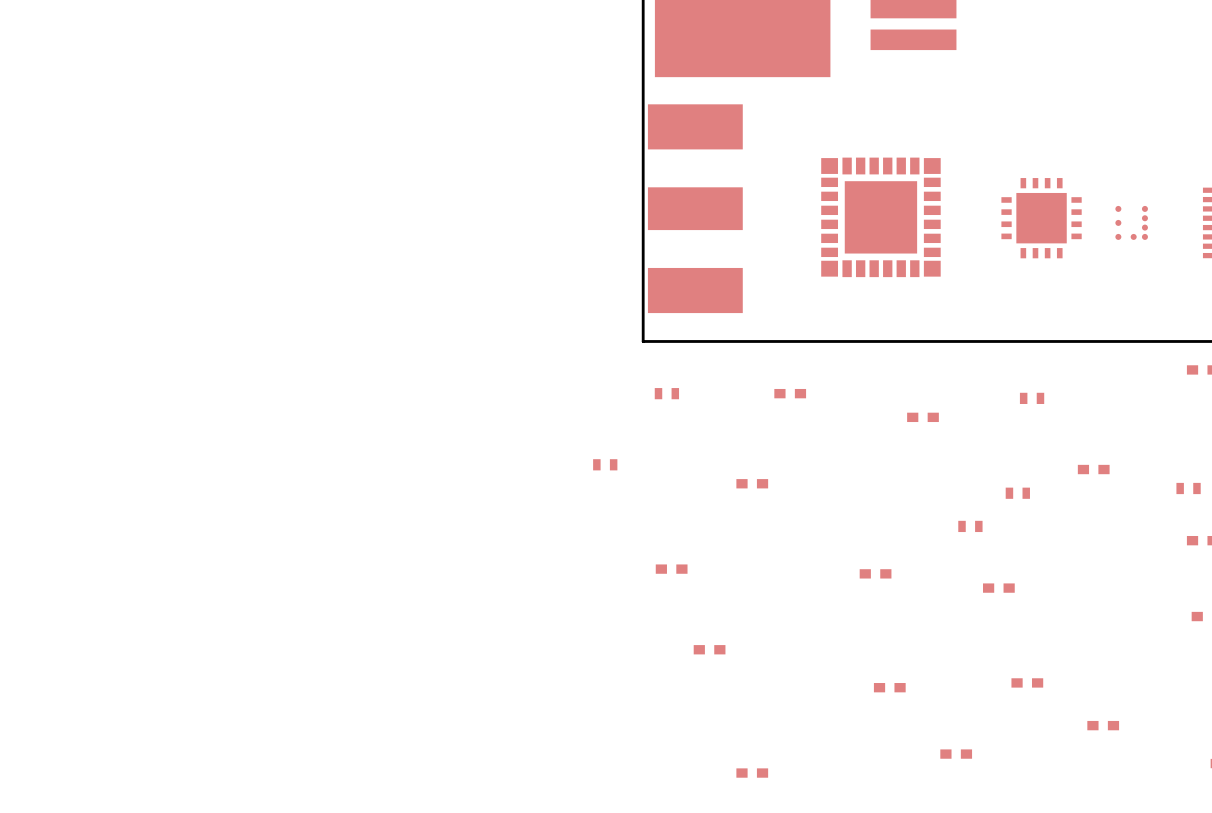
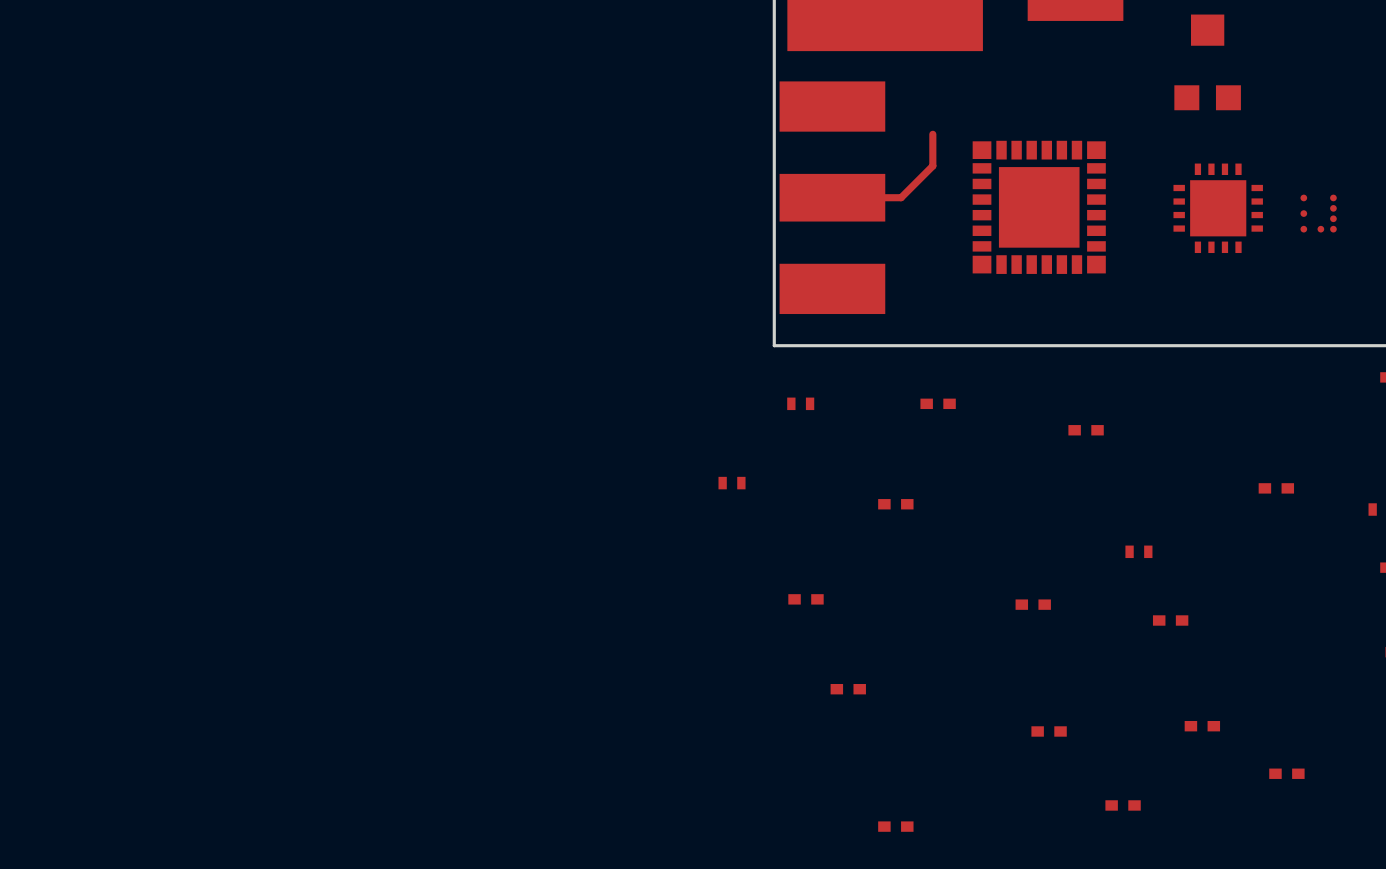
part: none -> (1207, 62)
top track: none -> (932, 134) (932, 166) (901, 197) (832, 197)
part: (1032, 398) -> none
part: (1017, 493) -> none

